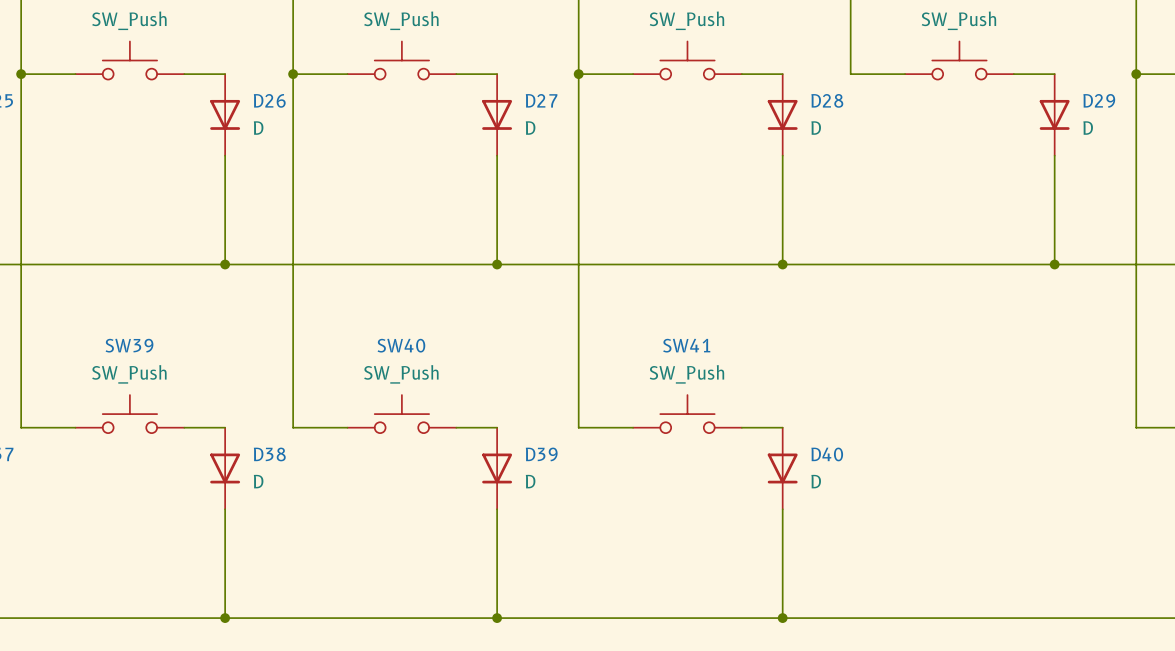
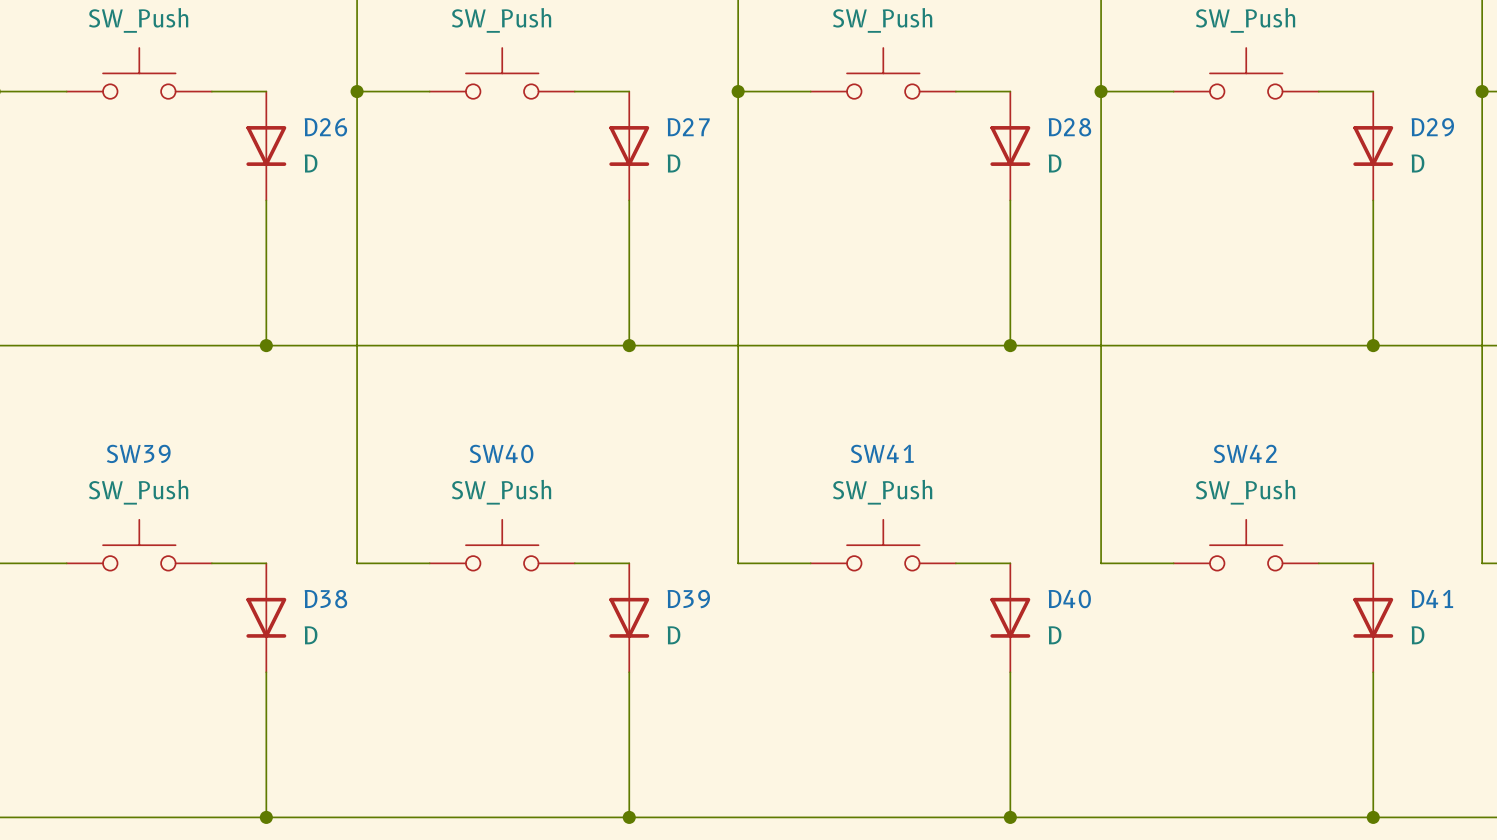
wire: none -> (1101, 91) (1101, 563) (1173, 563)
junction: none -> (1101, 91)
SW42: none -> SW_Push (1246, 545)
wire: none -> (1318, 563) (1373, 563)
D41: none -> D (1373, 617)
wire: none -> (1373, 672) (1373, 817)
junction: none -> (1373, 817)

